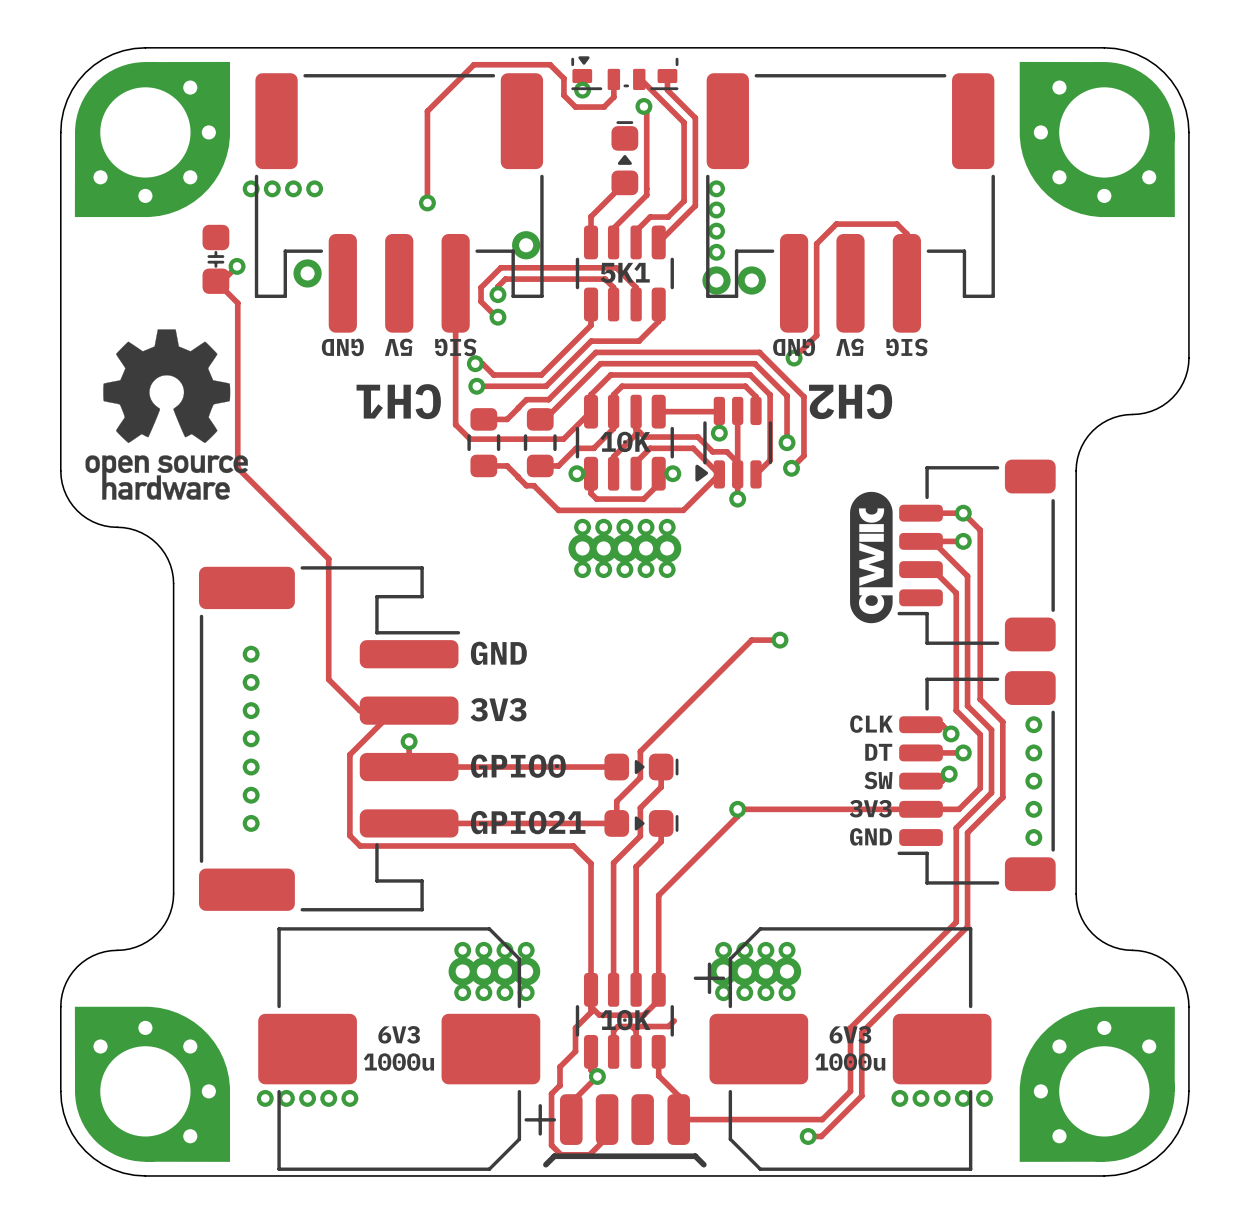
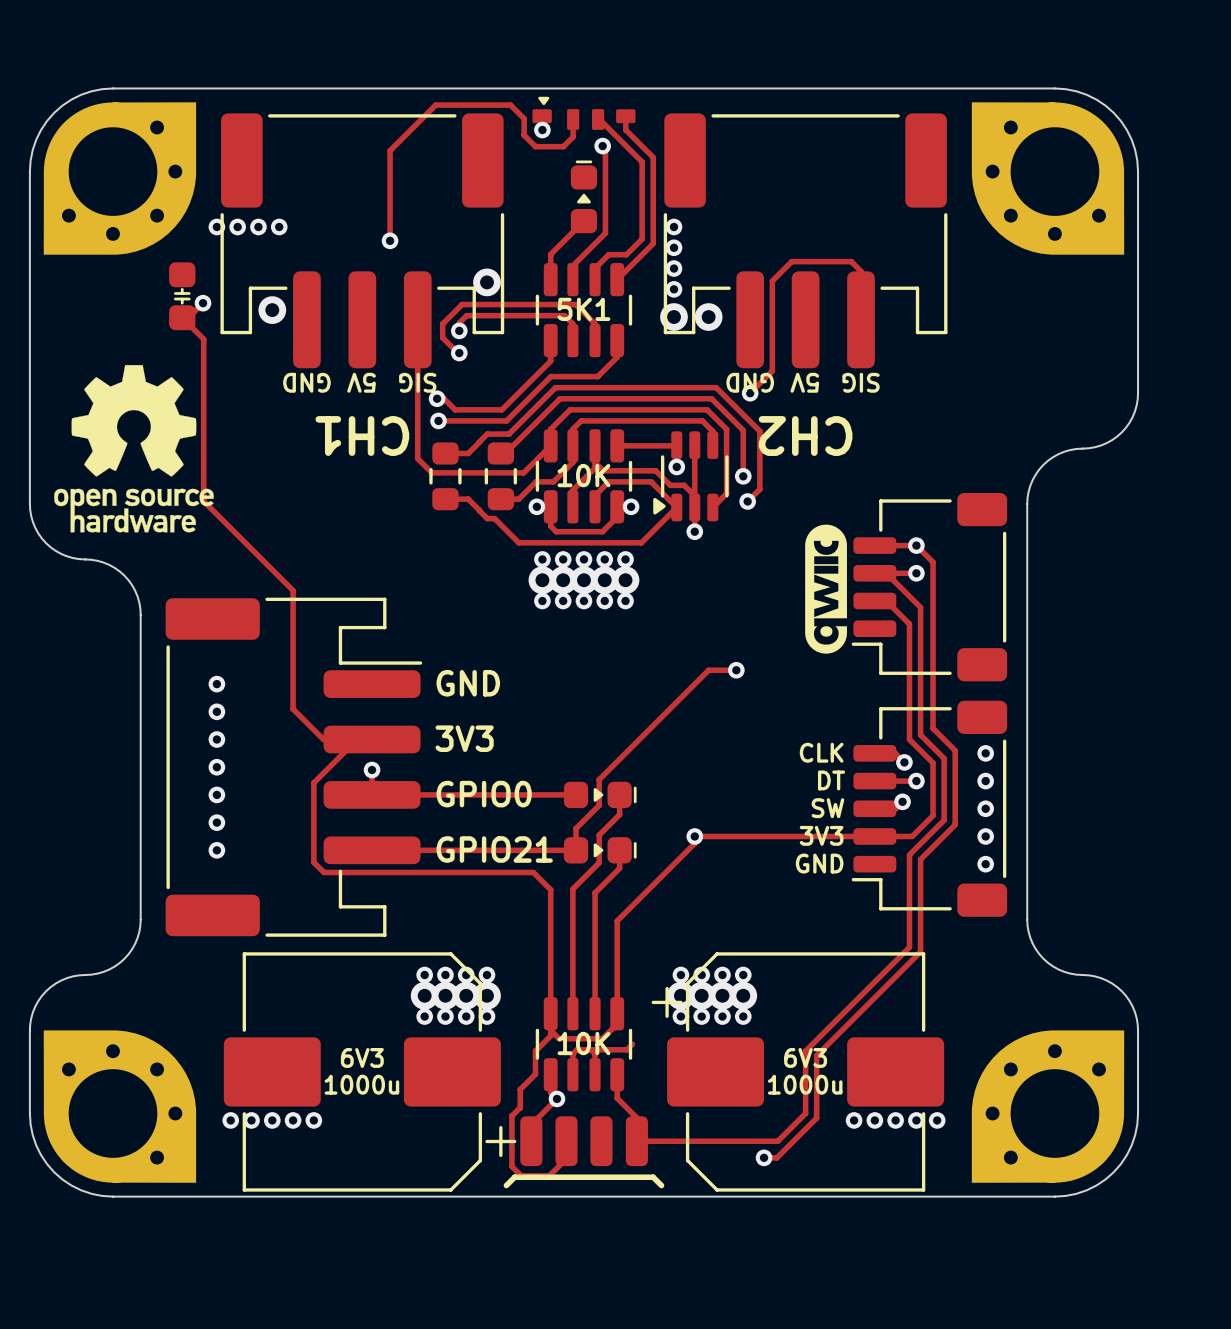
part footprint: [571, 56, 679, 91] -> [532, 96, 636, 130]

